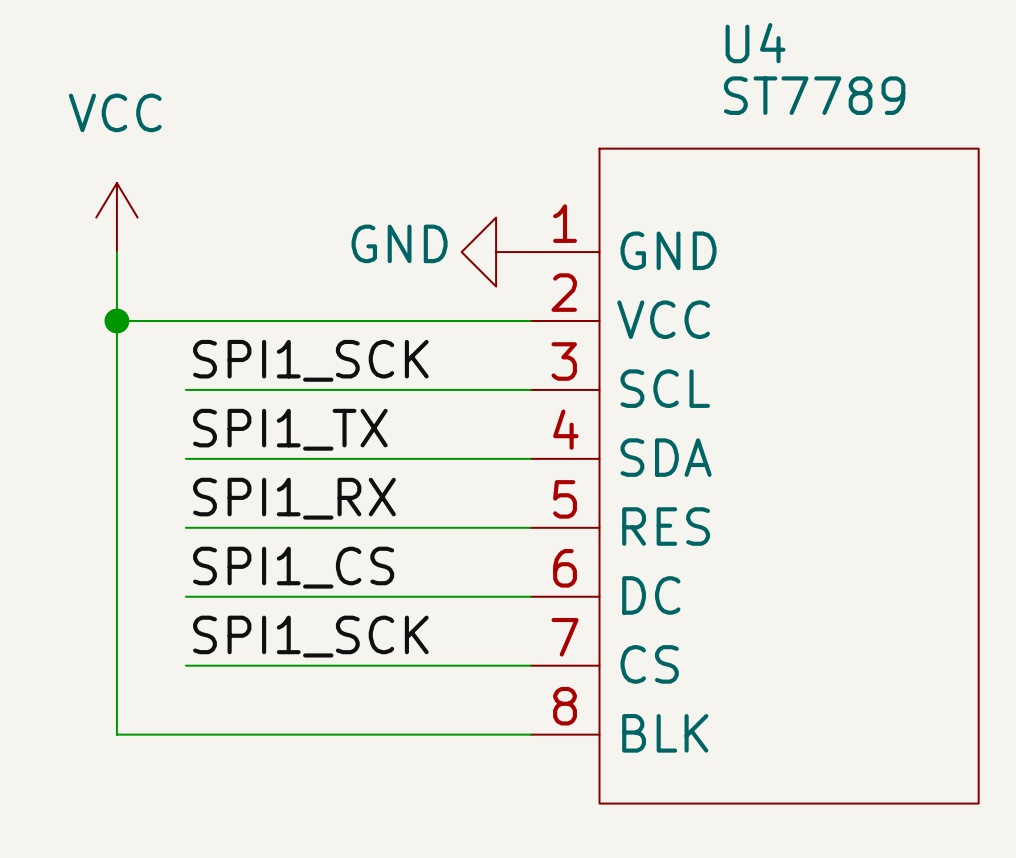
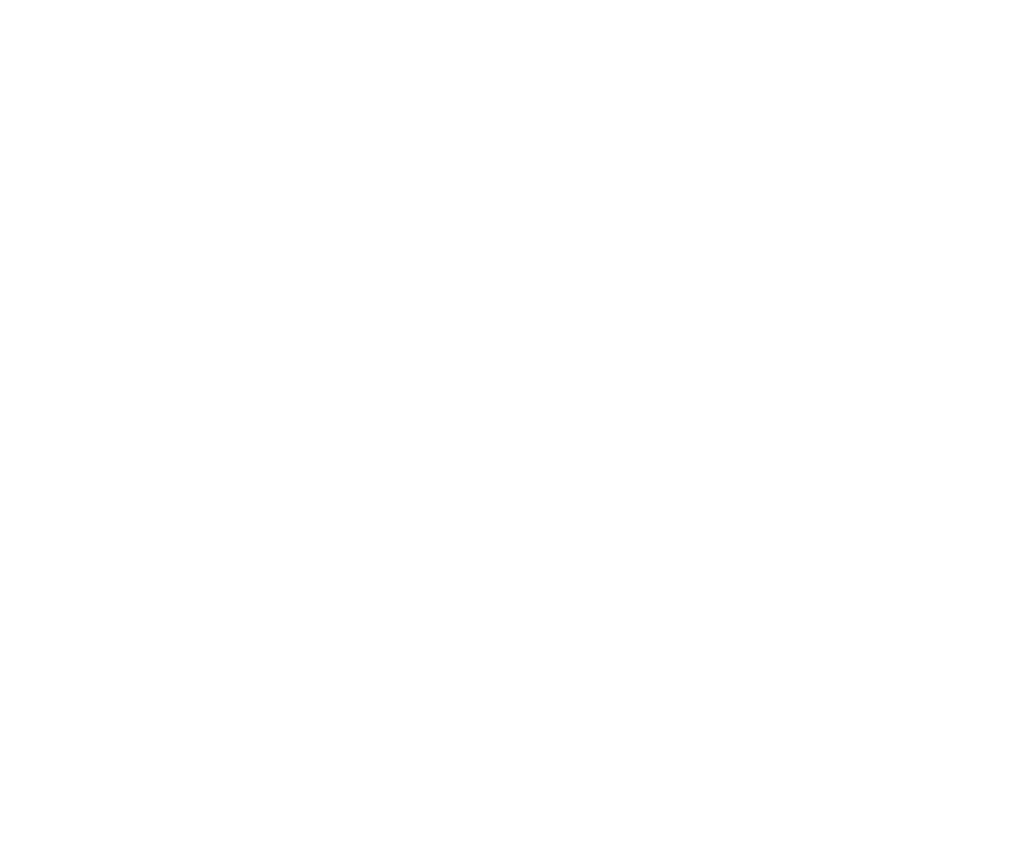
power symbol: VCC (116, 217) -> none
wire: (116, 252) (116, 734) (530, 734) -> none
power symbol: GND (496, 252) -> none
wire: (116, 321) (530, 321) -> none
junction: (116, 321) -> none
label: SPI1_SCK (310, 360) -> none
wire: (185, 389) (530, 389) -> none
label: SPI1_TX (290, 429) -> none
wire: (185, 458) (530, 458) -> none
U4: ST7789 (754, 476) -> none
label: SPI1_RX (294, 498) -> none
wire: (185, 527) (530, 527) -> none
label: SPI1_CS (293, 567) -> none
wire: (185, 596) (530, 596) -> none
label: SPI1_SCK (310, 636) -> none
wire: (185, 665) (530, 665) -> none

